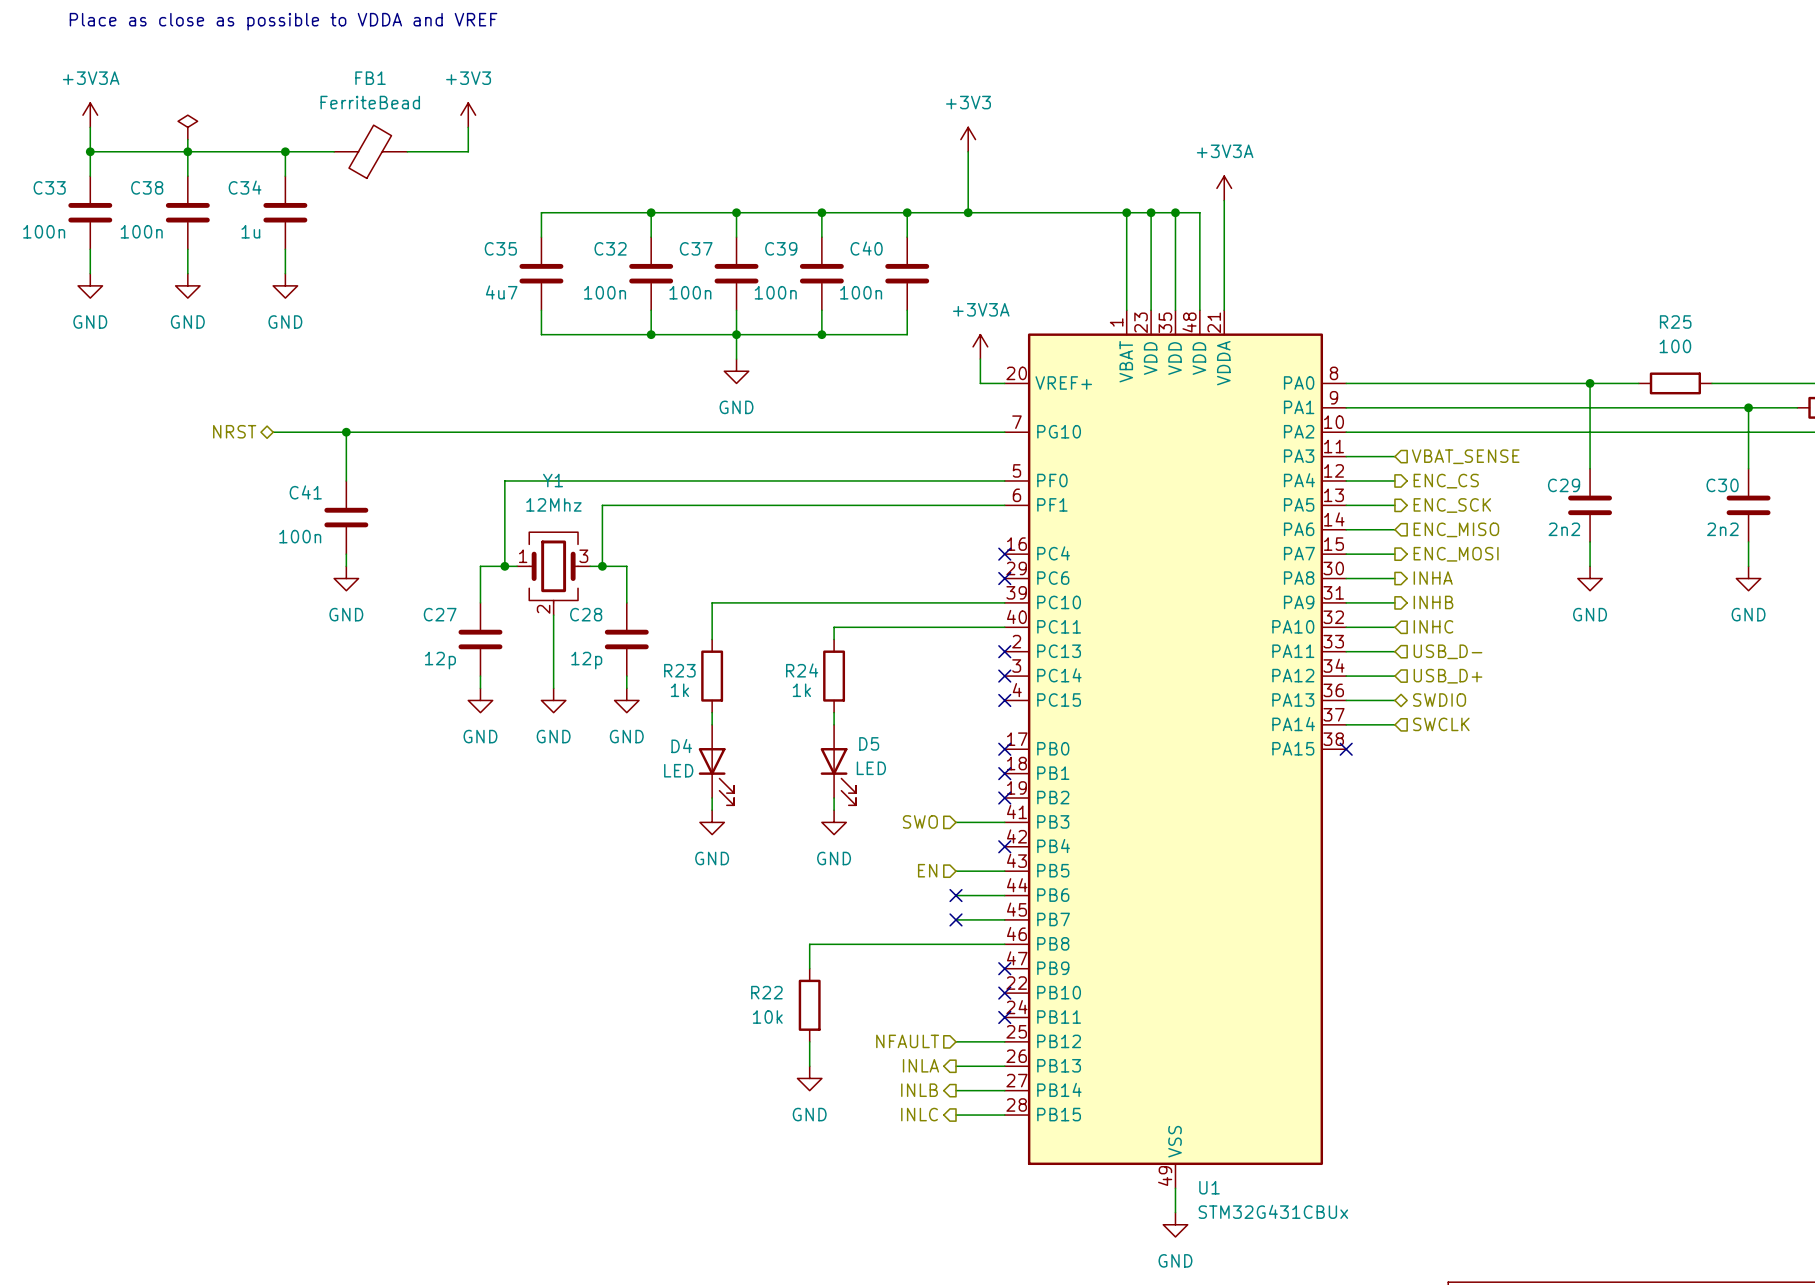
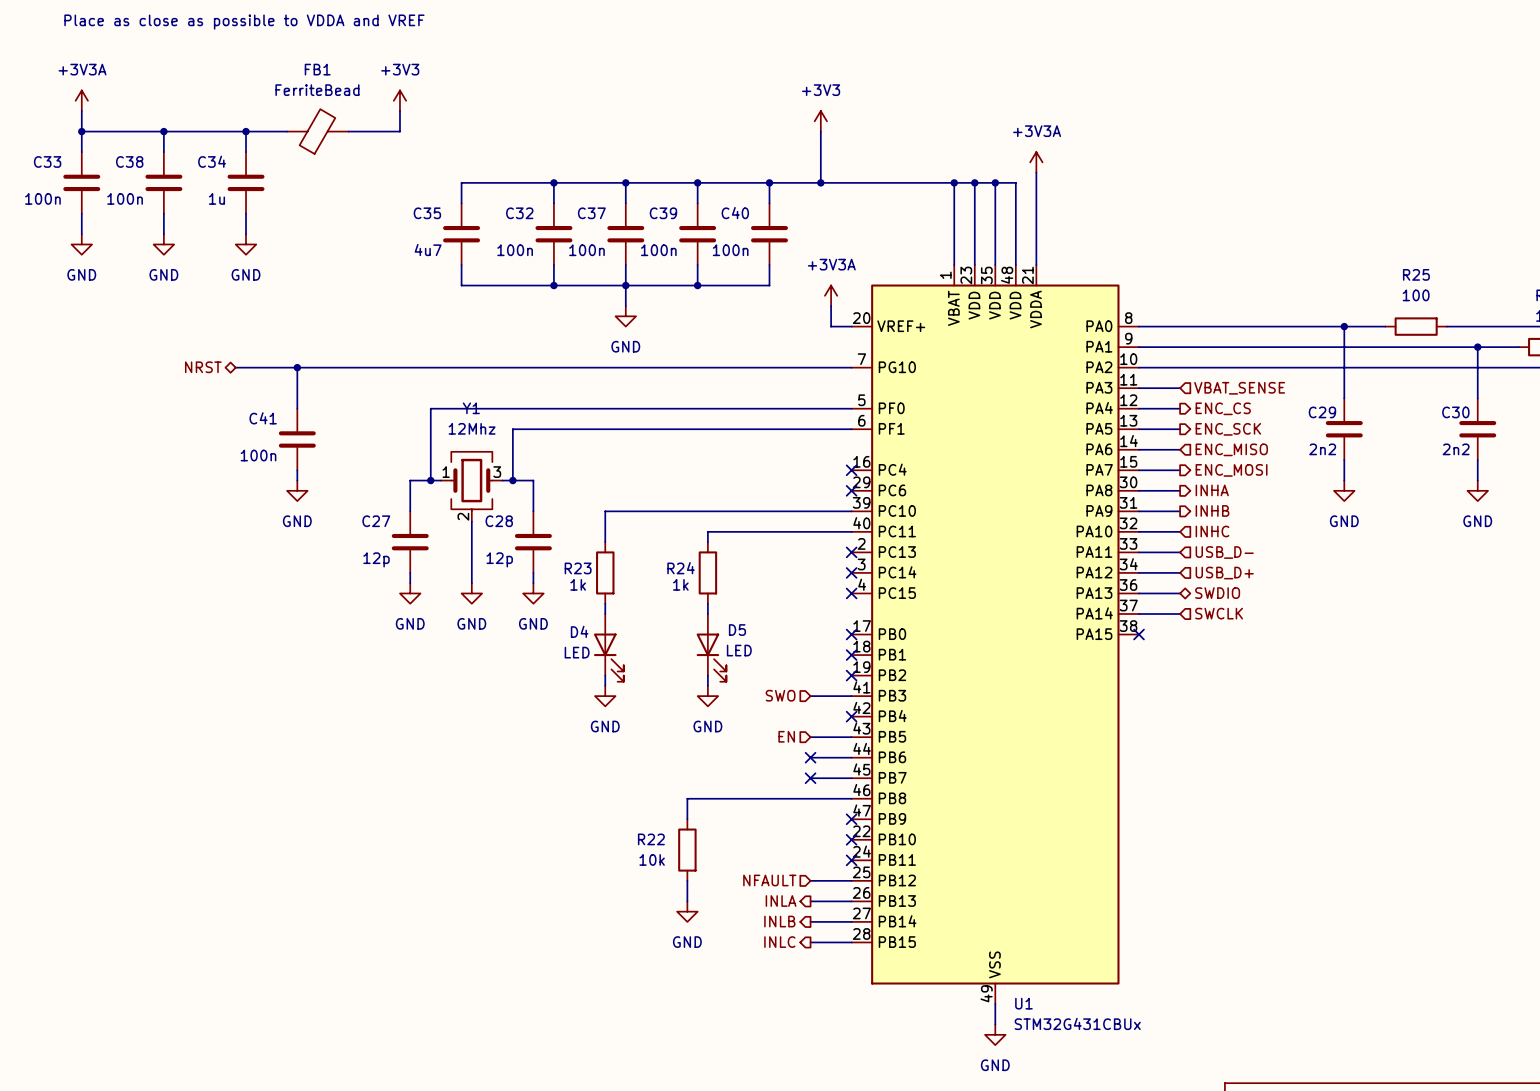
power symbol: (187, 127) -> none
wire: (187, 139) (187, 151) -> none

